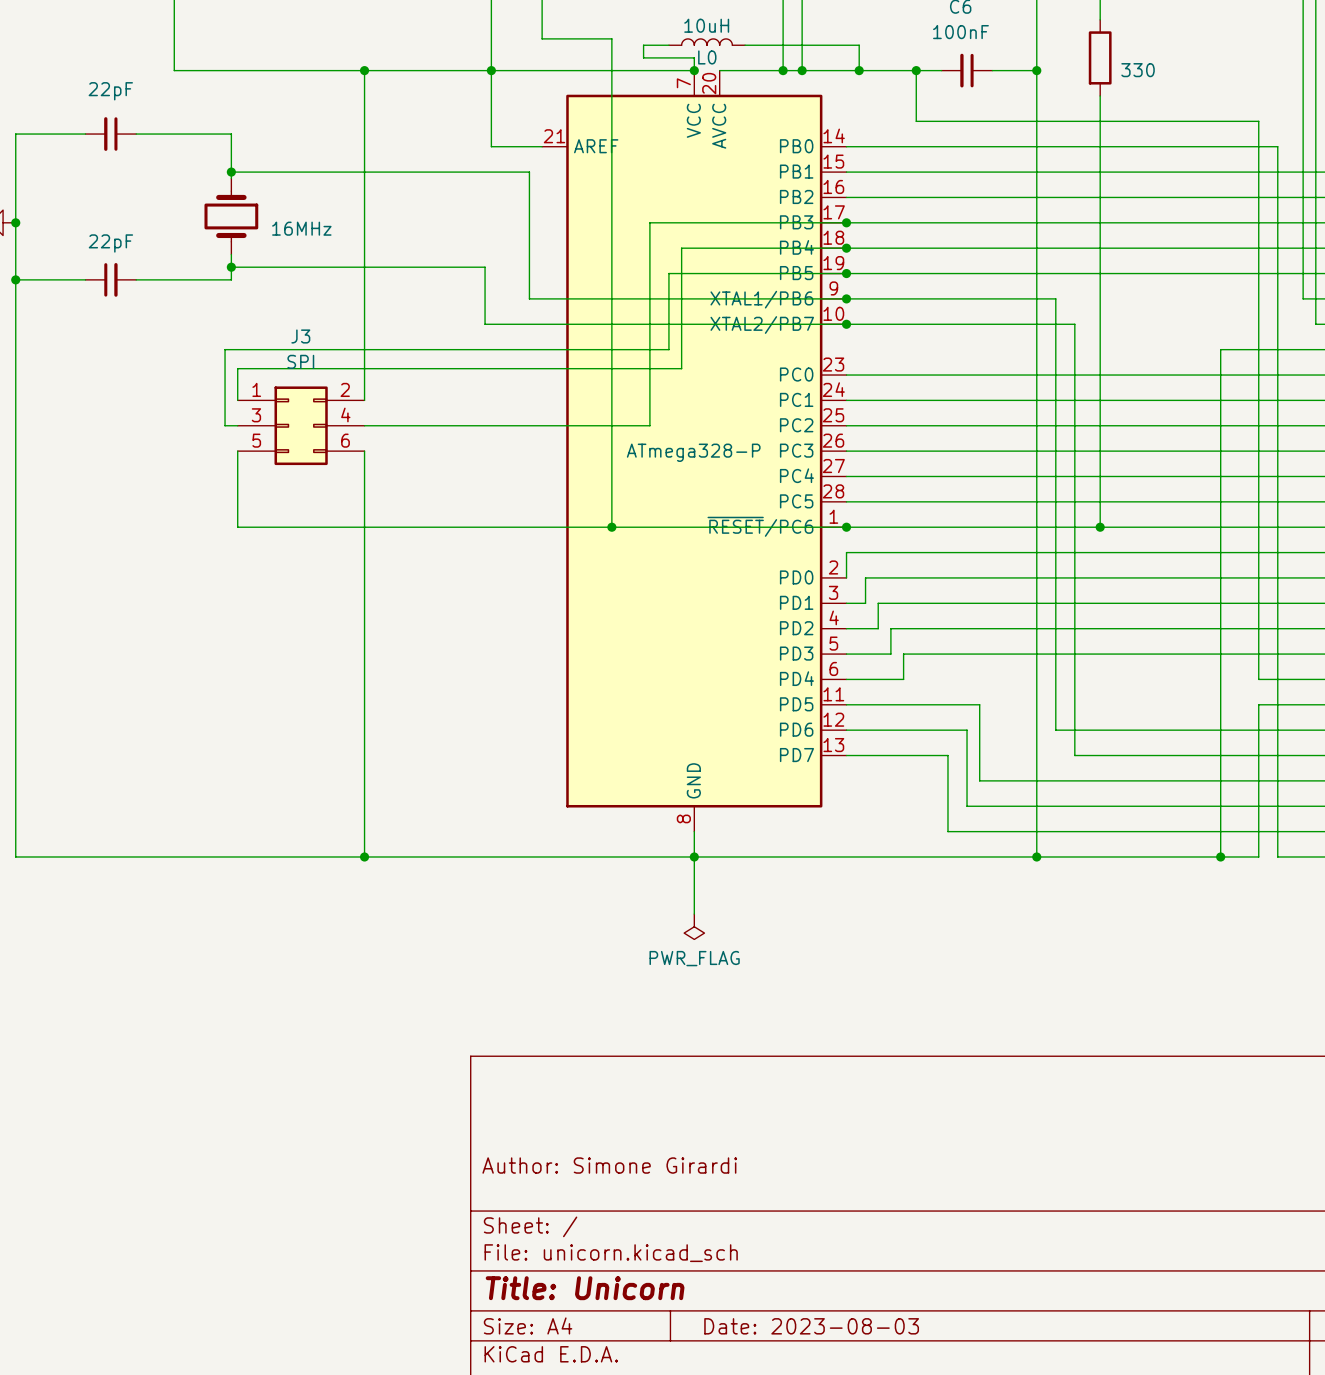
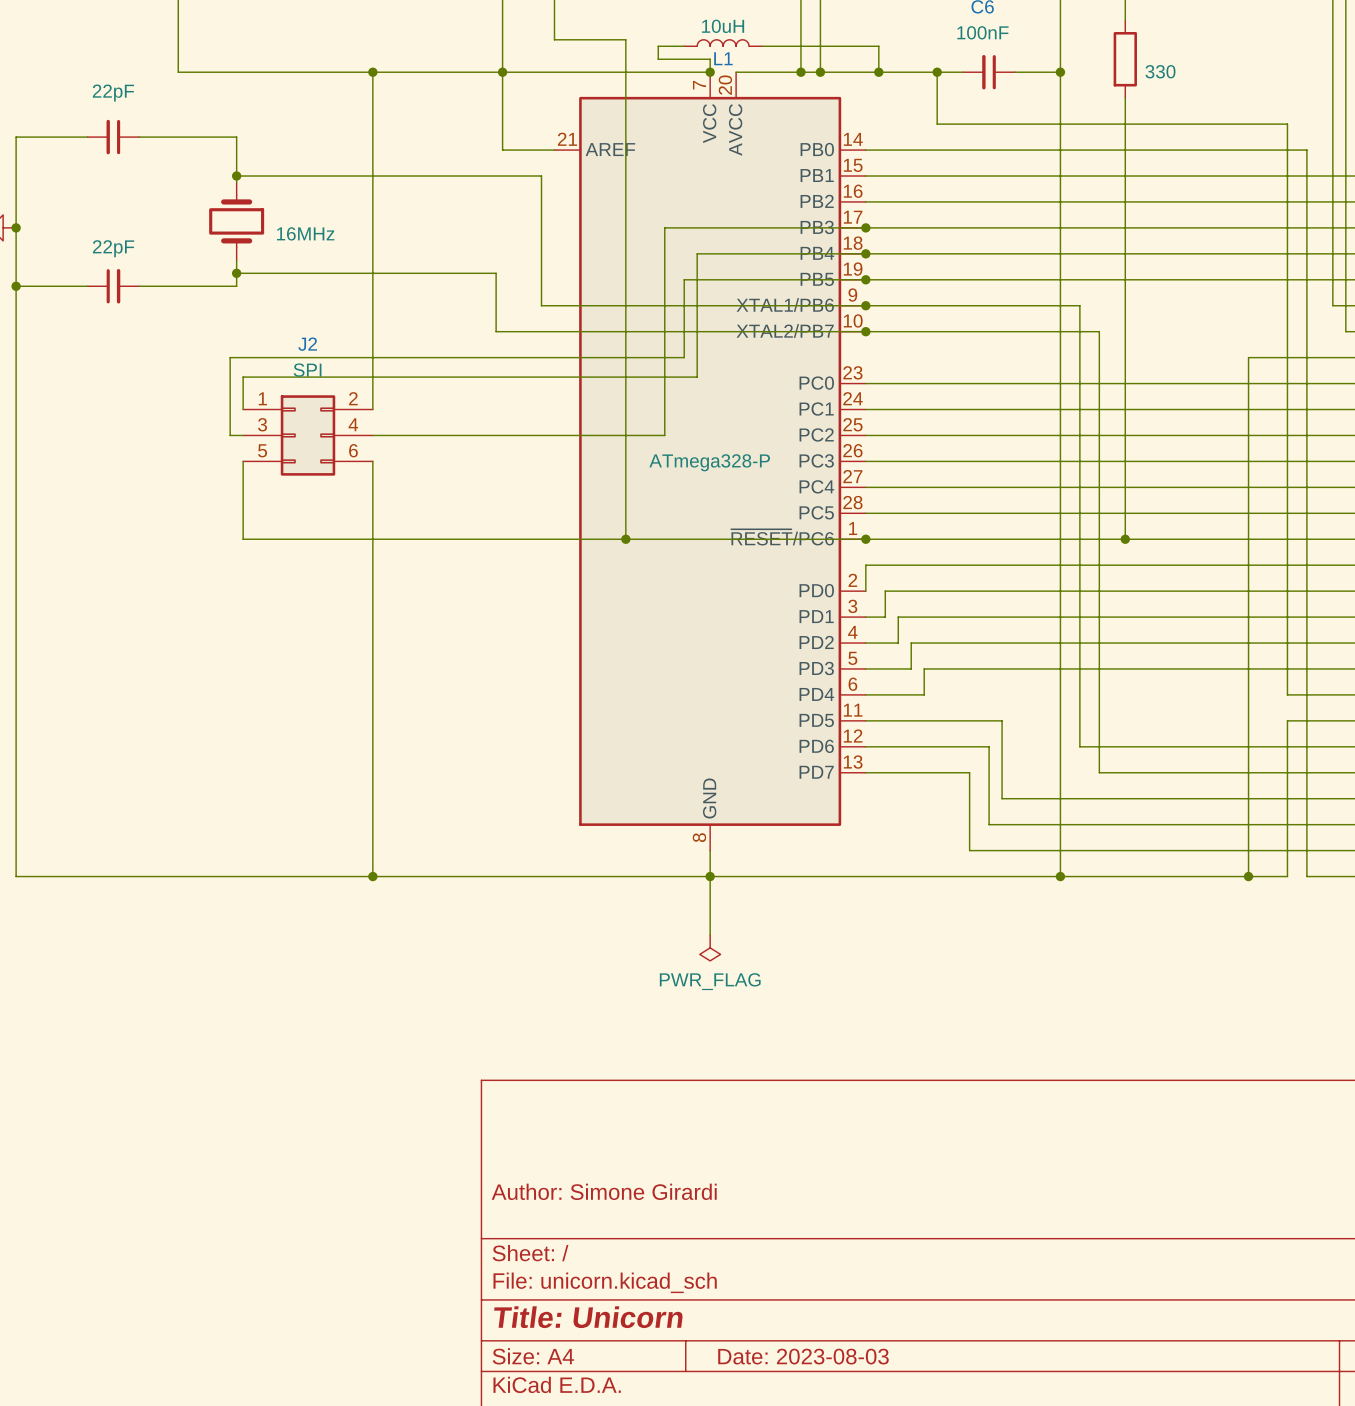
L0 name: L0 (707, 57) -> L1 (723, 58)
J3 name: J3 (300, 336) -> J2 (307, 344)

